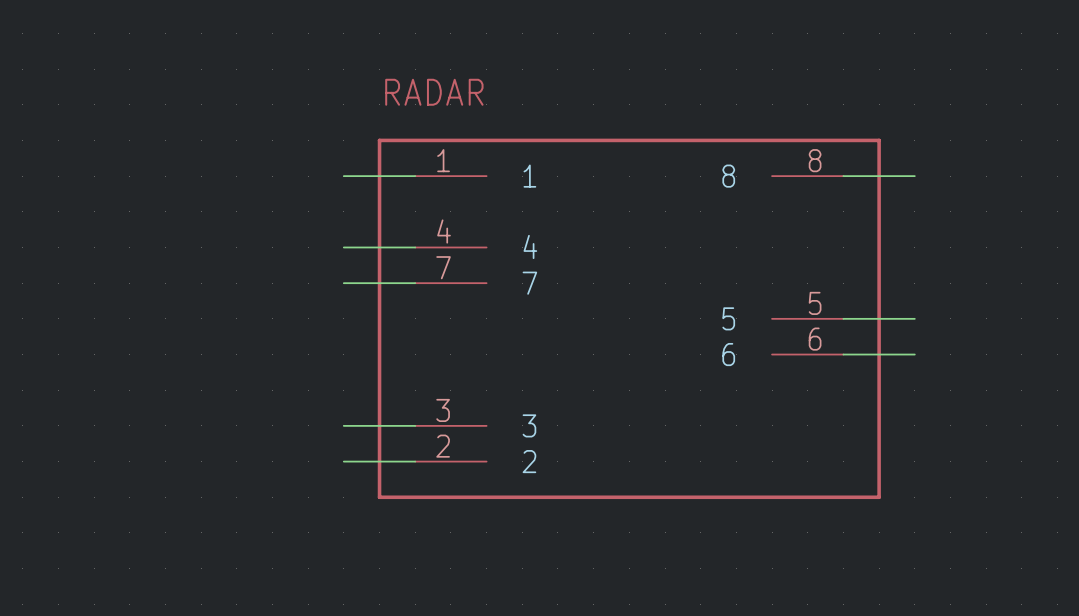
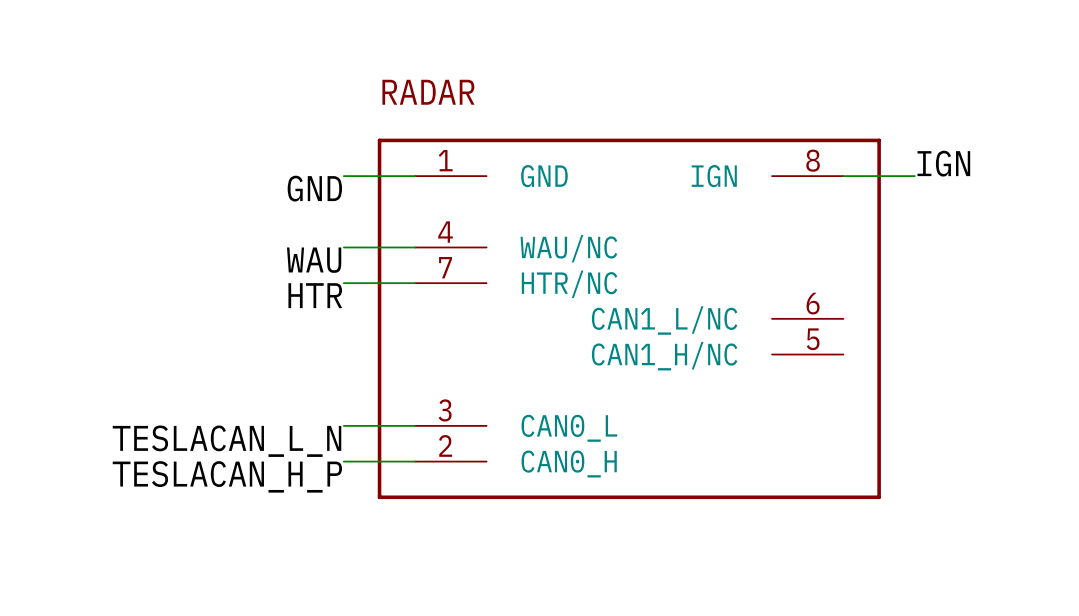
RADAR symbol: [377, 138, 881, 500] -> [377, 138, 881, 500]
label: none -> IGN (943, 163)
label: none -> GND (314, 188)
label: none -> WAU (314, 260)
label: none -> HTR (315, 295)
wire: (843, 318) (914, 318) -> none
wire: (843, 354) (914, 354) -> none
label: none -> TESLACAN_L_N (227, 441)
label: none -> TESLACAN_H_P (227, 476)

